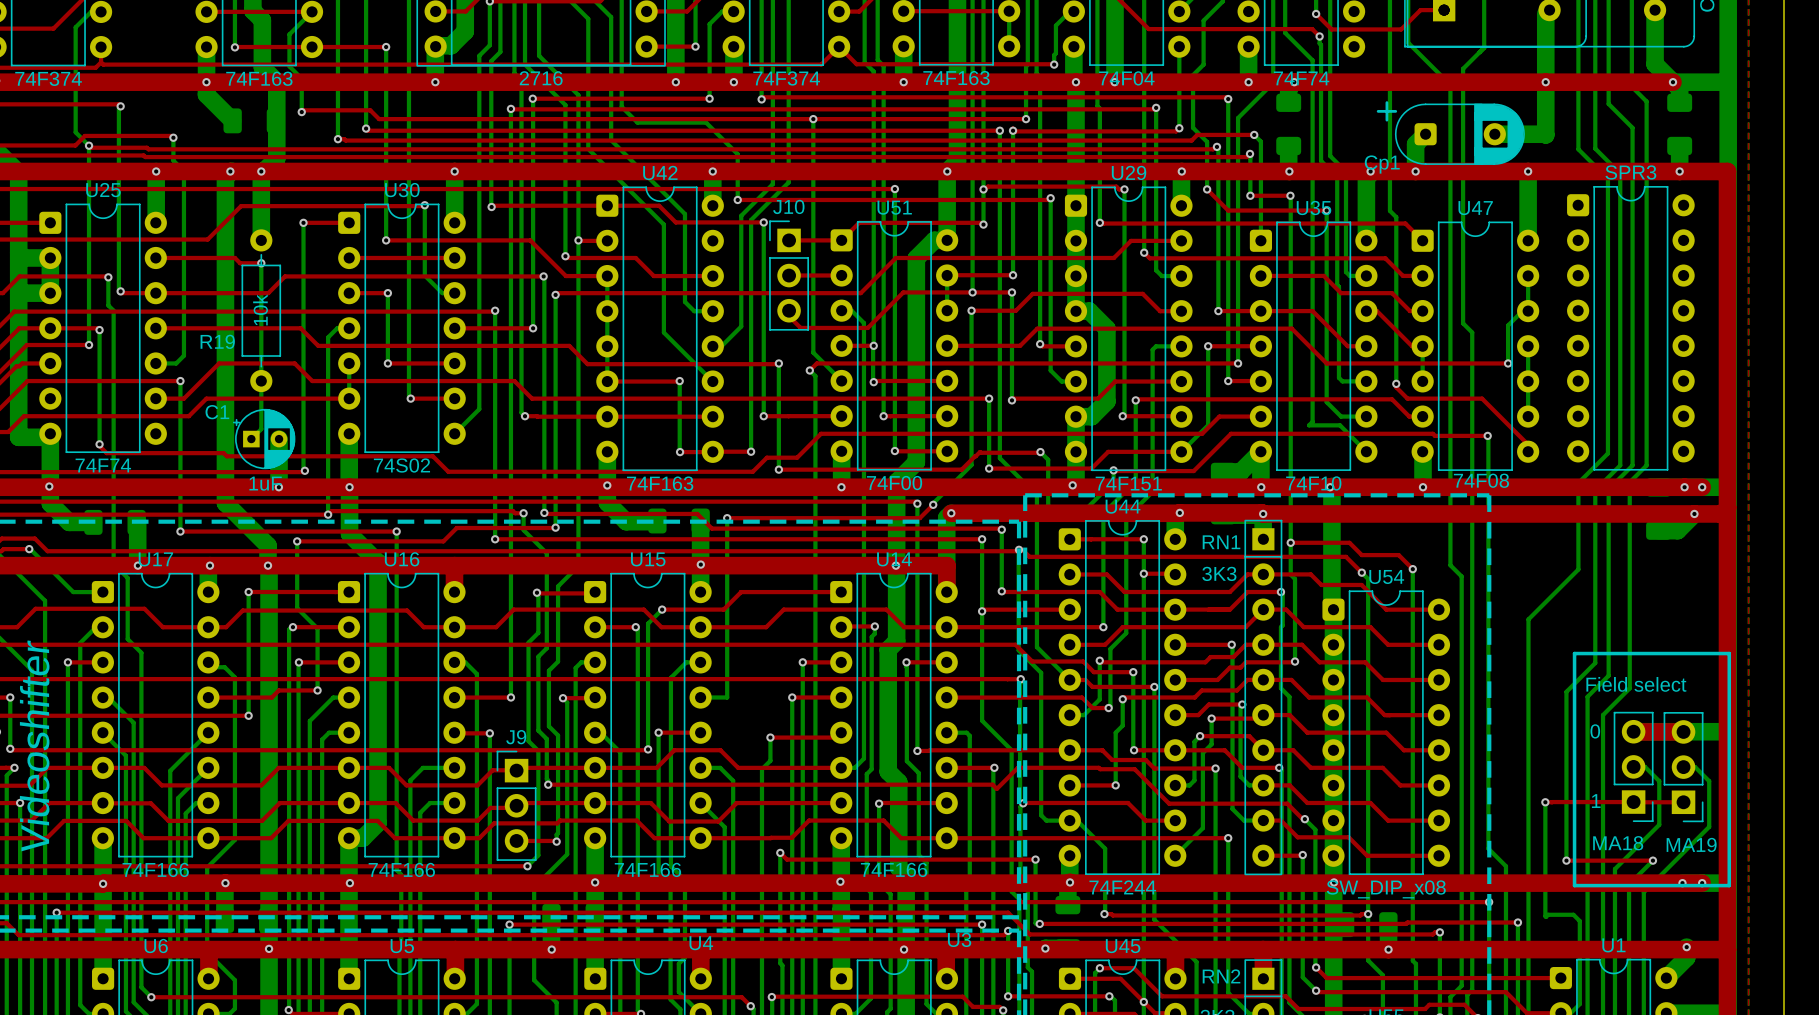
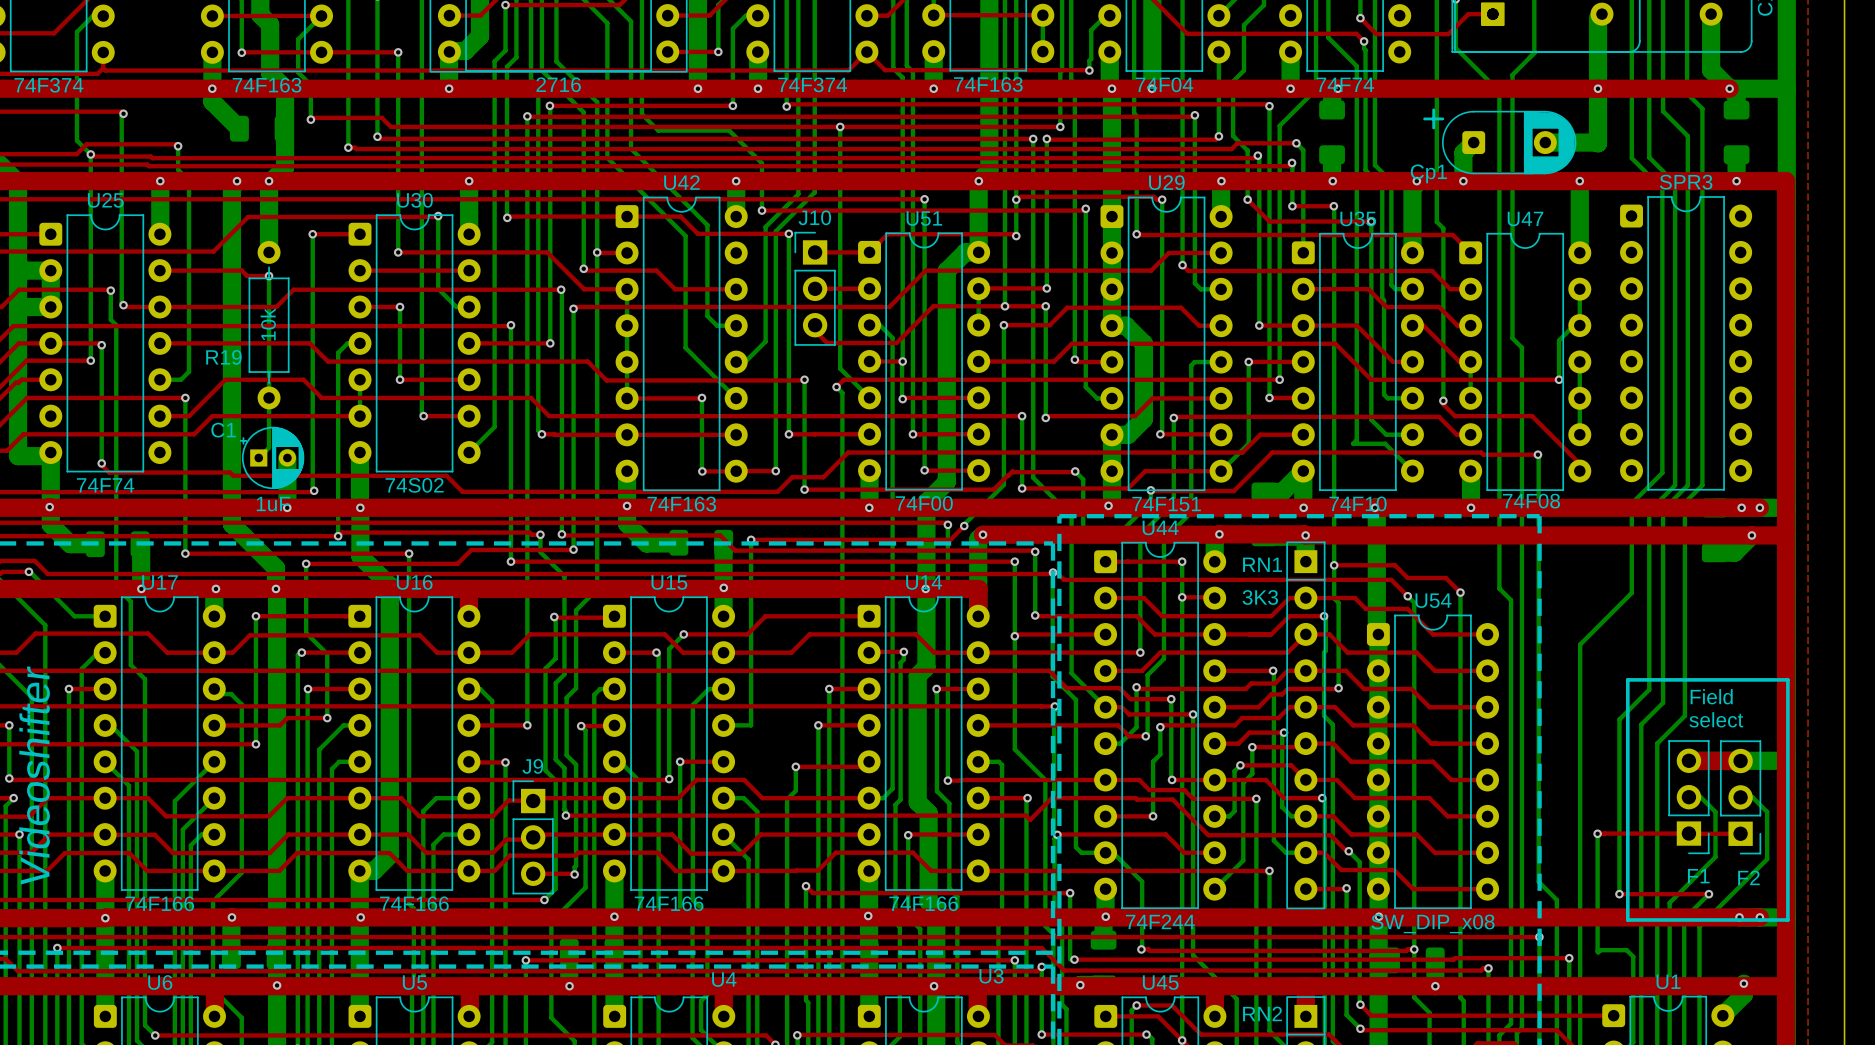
text: none -> Field (1711, 696)
text: Field select (1636, 684) -> select (1716, 719)
text: 0 (1595, 731) -> none
text: 1 (1596, 801) -> none
MA18 name: MA18 (1618, 843) -> F1 (1698, 876)
MA19 name: MA19 (1691, 844) -> F2 (1748, 877)

